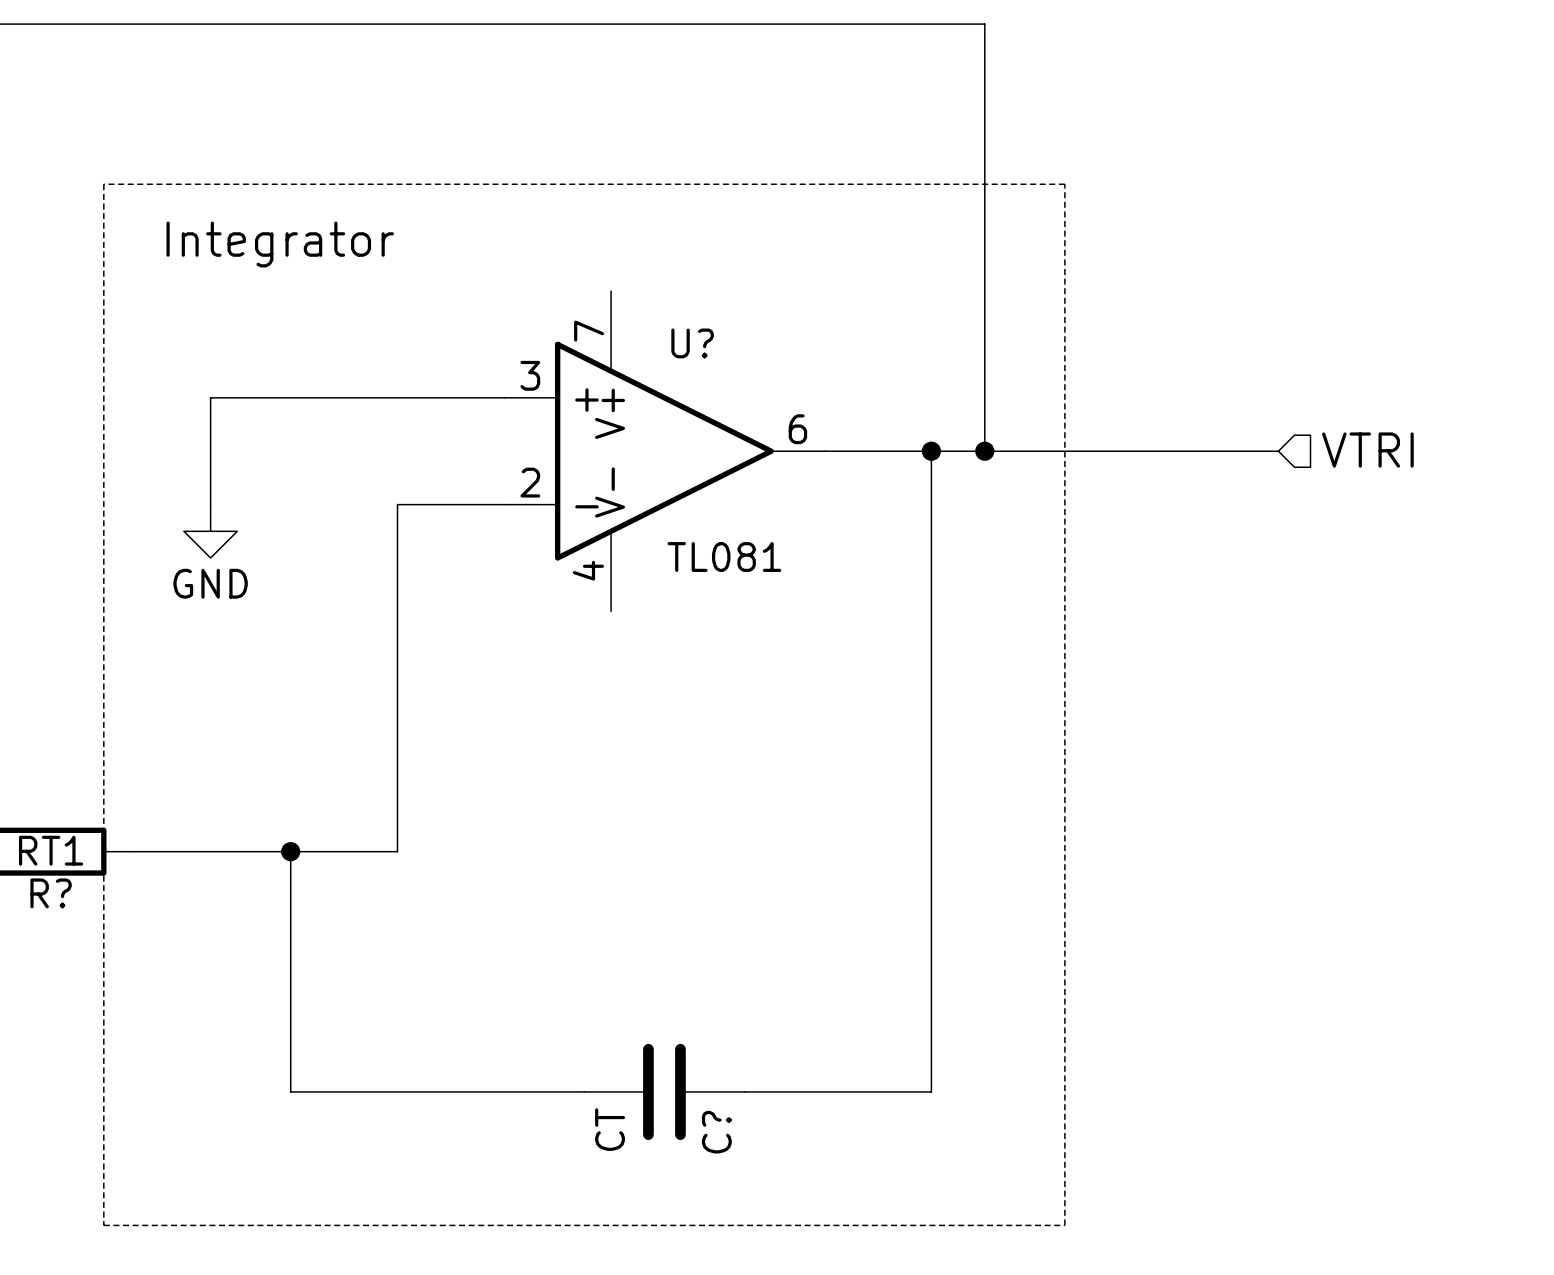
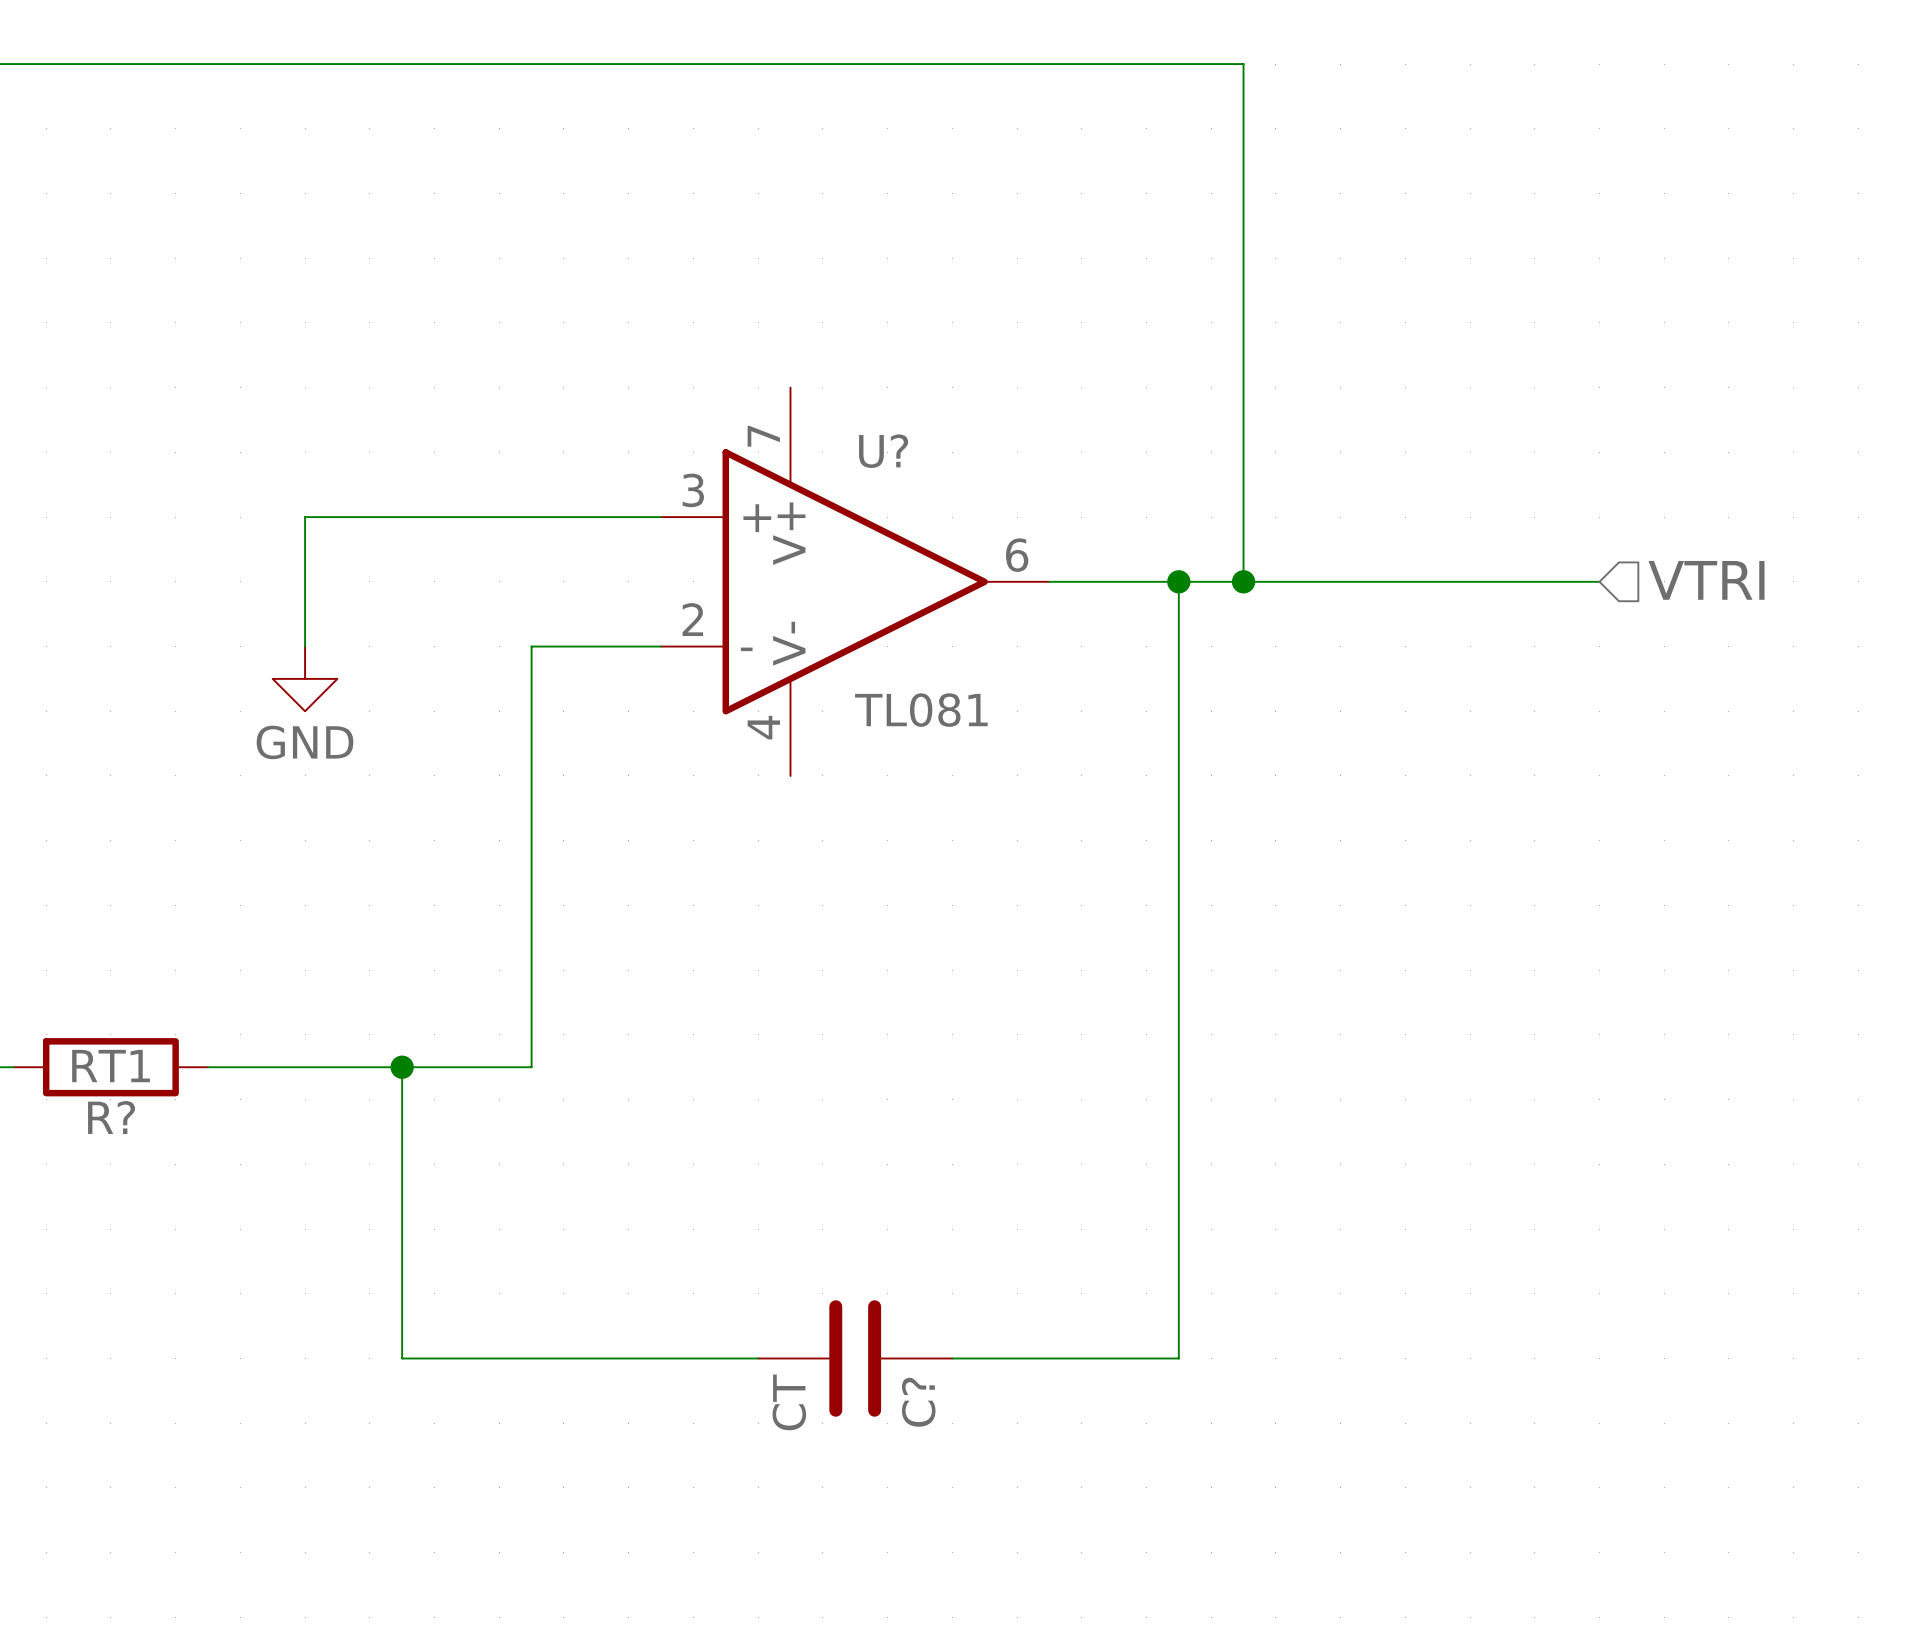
line: (103, 184) (103, 1225) (1064, 1225) (1064, 184) (103, 184) -> none
text: Integrator (280, 244) -> none

